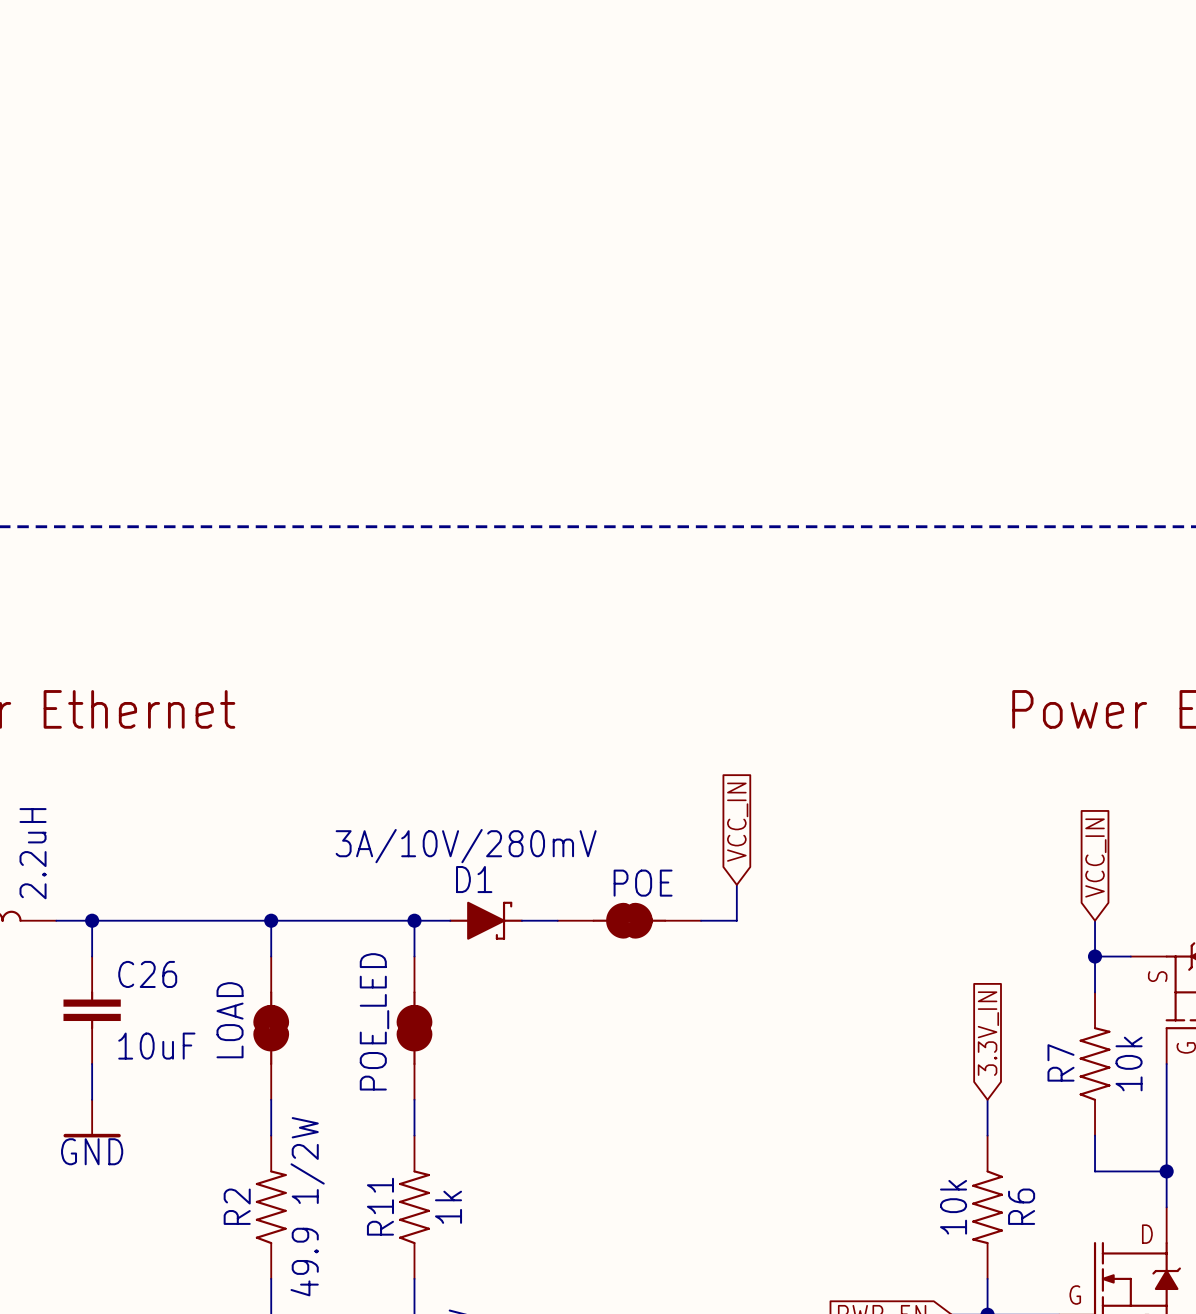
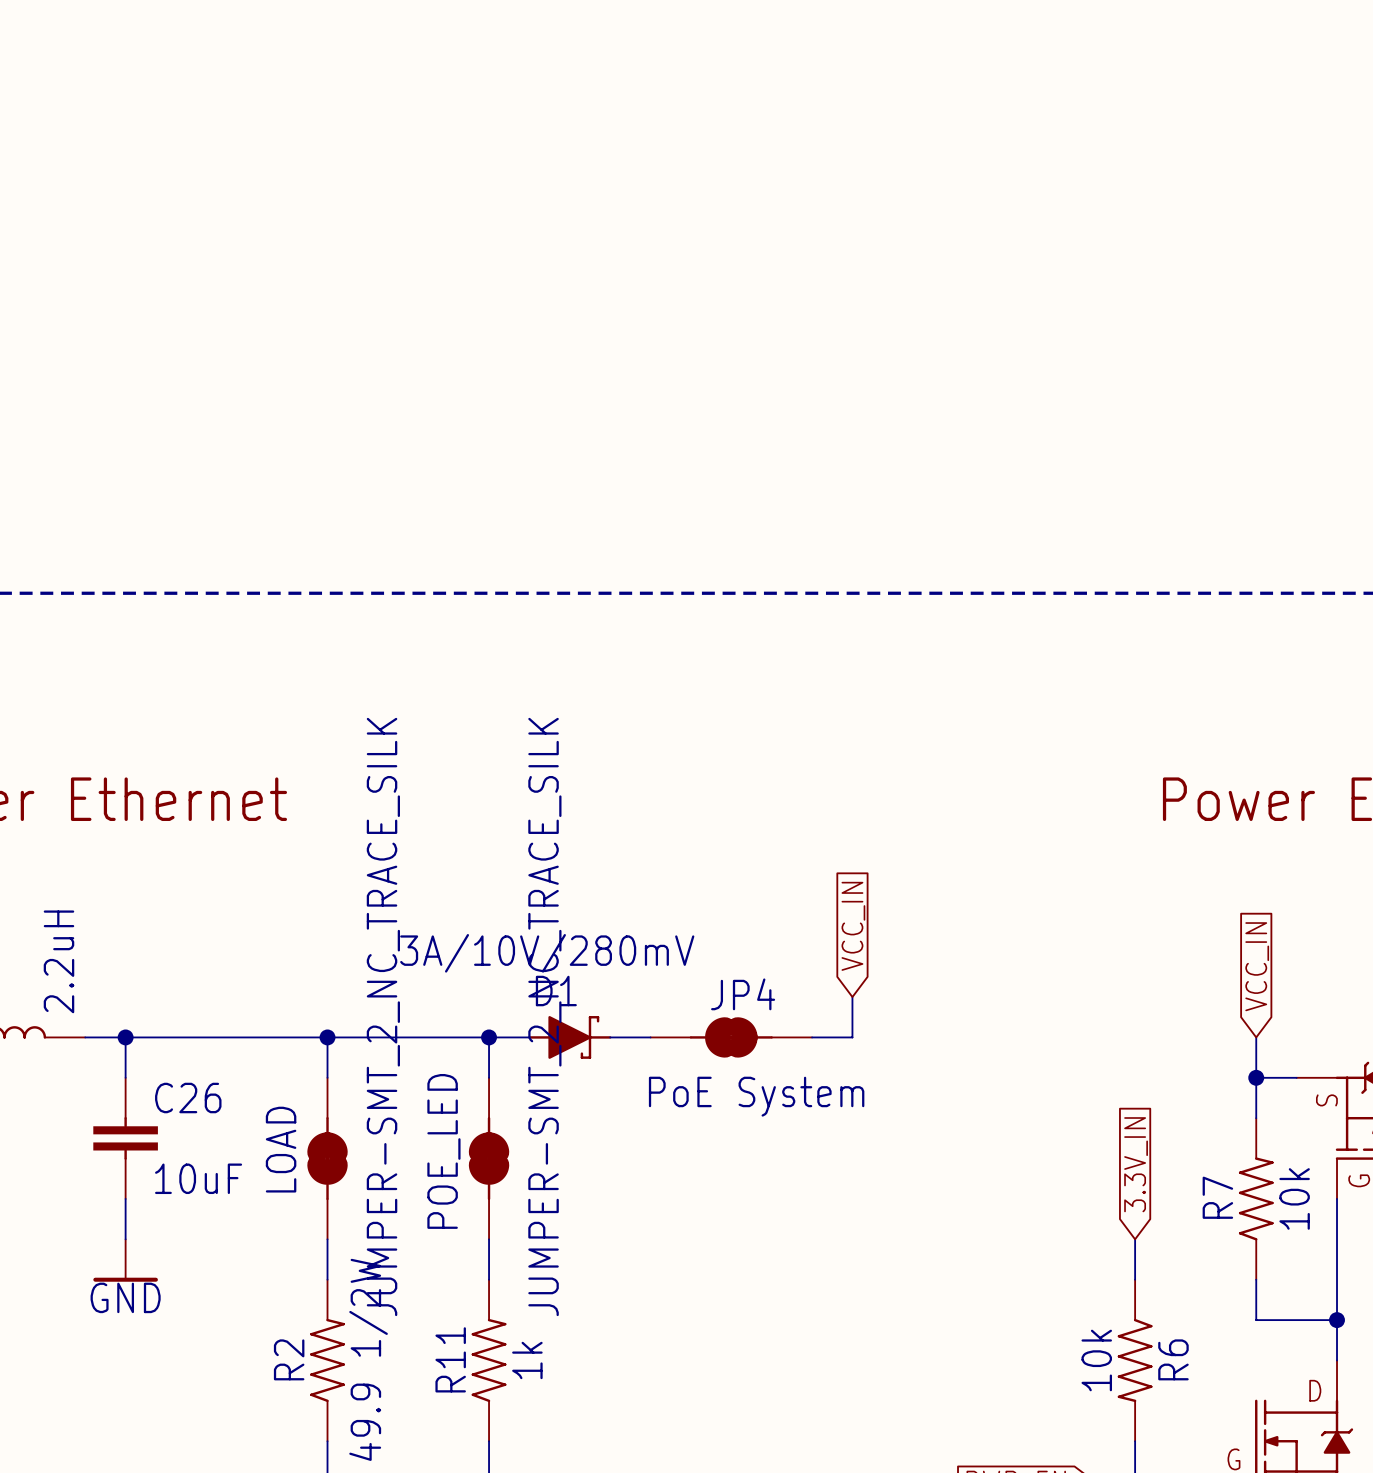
POE name: POE (643, 883) -> JP4 (743, 994)
LOAD value: none -> JUMPER-SMT_2_NC_TRACE_SILK (383, 1016)
POE_LED value: none -> JUMPER-SMT_2_NC_TRACE_SILK (544, 1016)
POE value: none -> PoE System (756, 1096)

